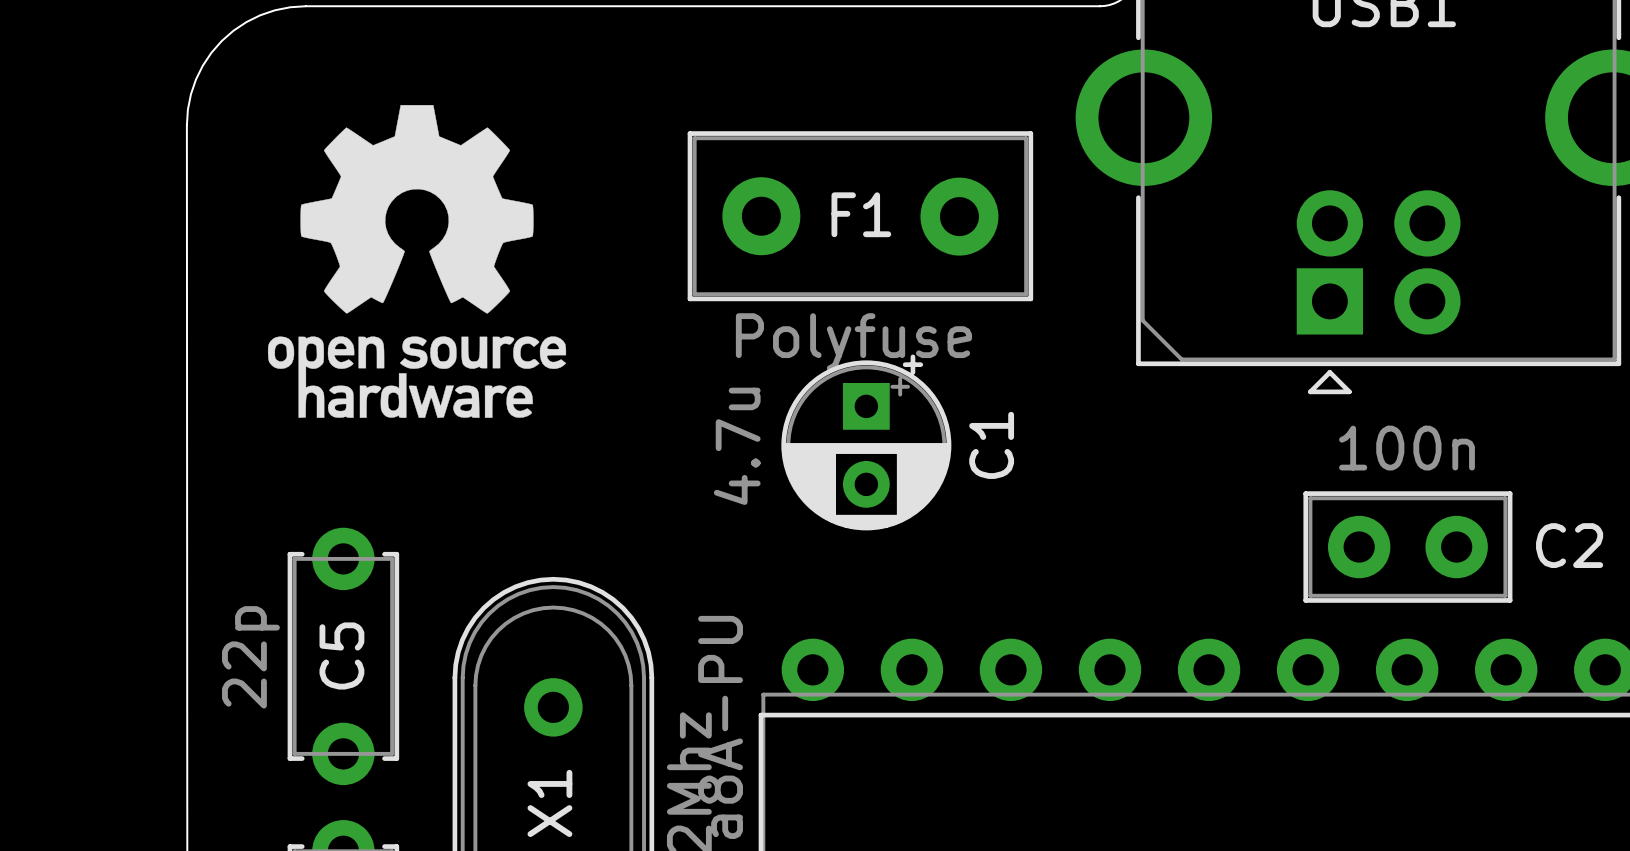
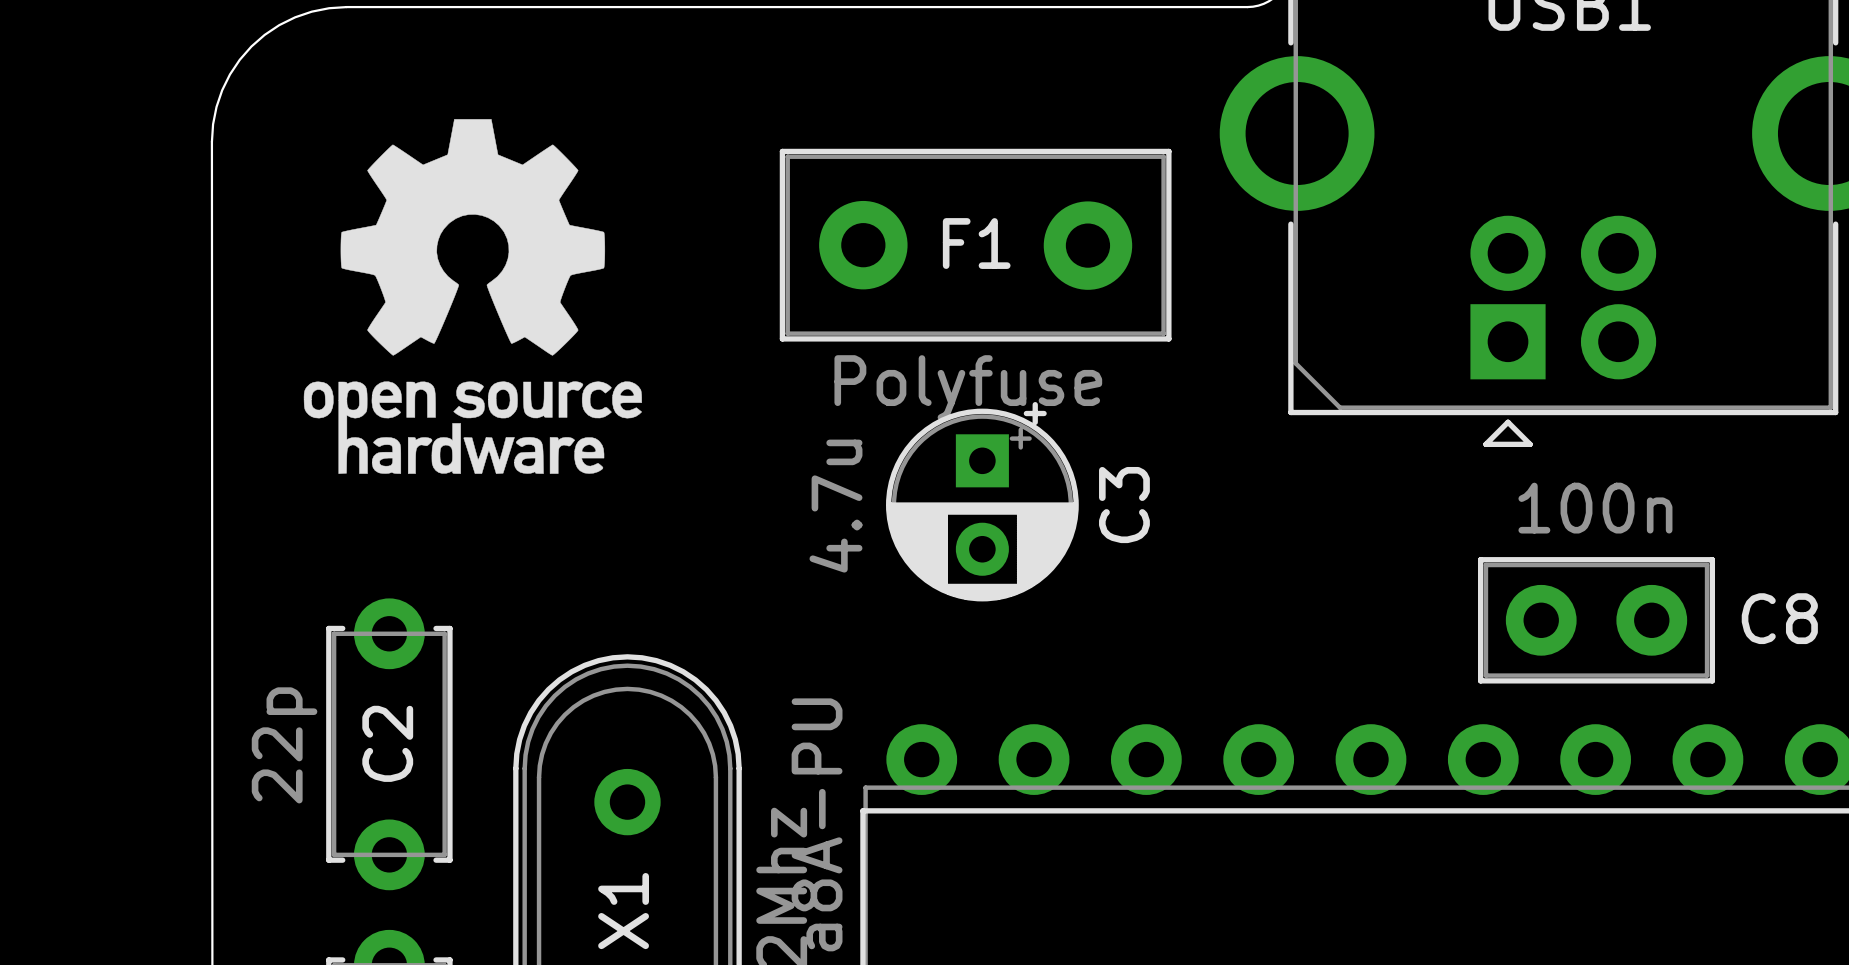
C1 name: C1 (991, 445) -> C3 (1124, 505)
C2 name: C2 (1569, 545) -> C8 (1779, 618)
C5 name: C5 (341, 655) -> C2 (387, 743)

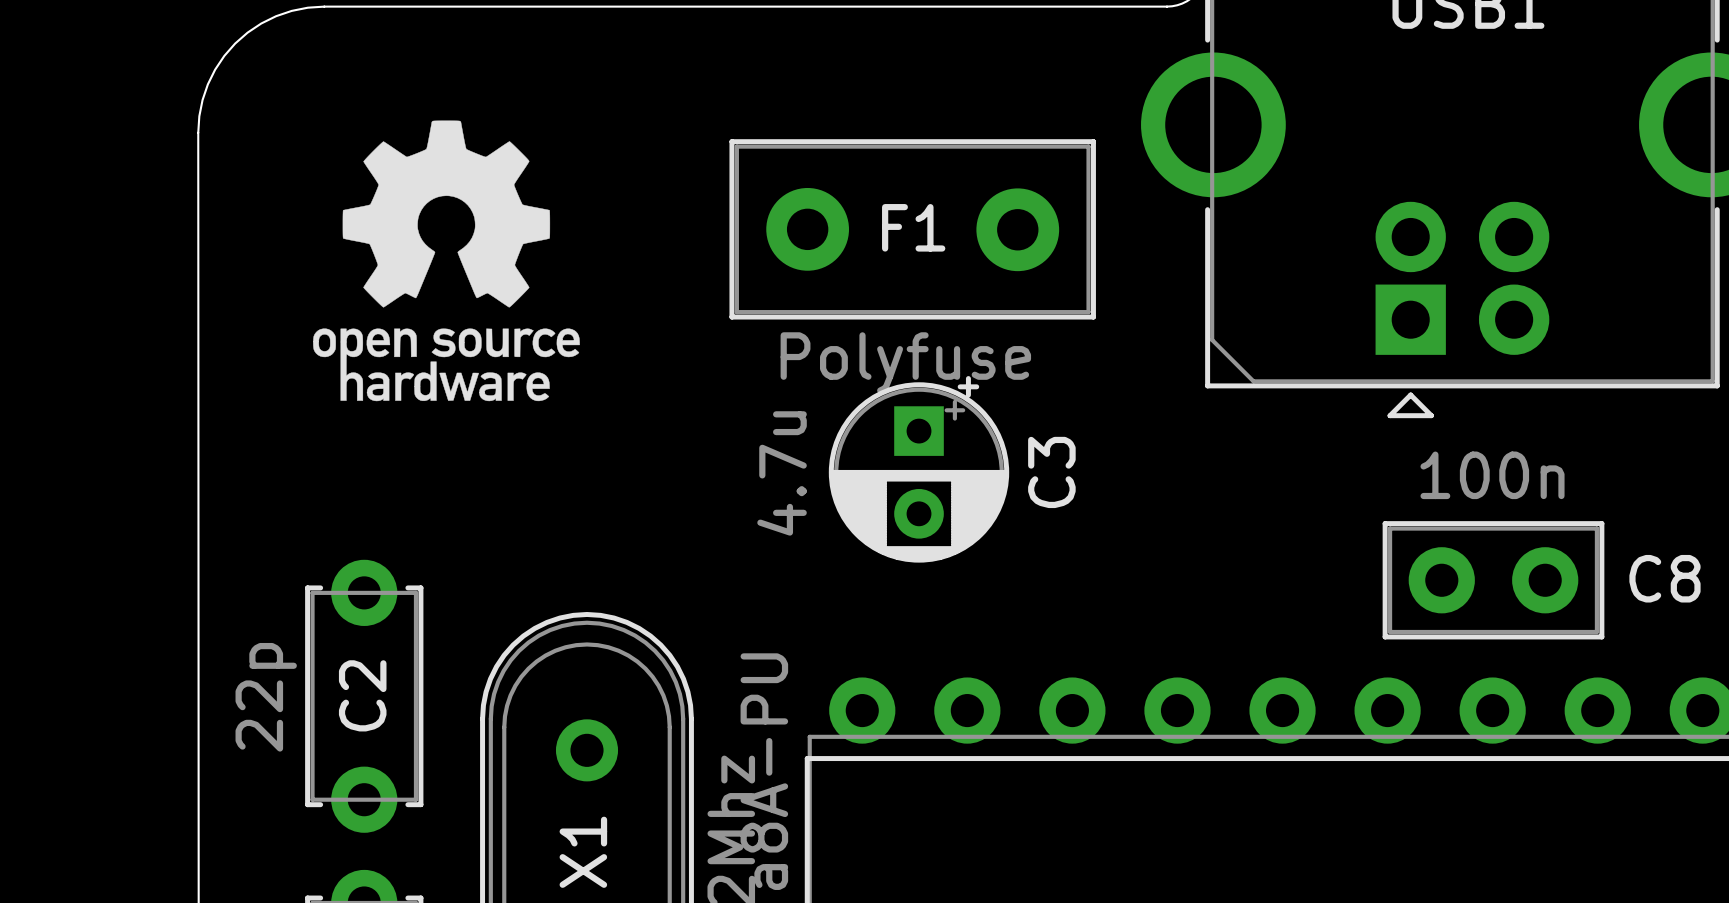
drawing shape: [303, 119, 642, 474] -> [313, 120, 580, 402]

